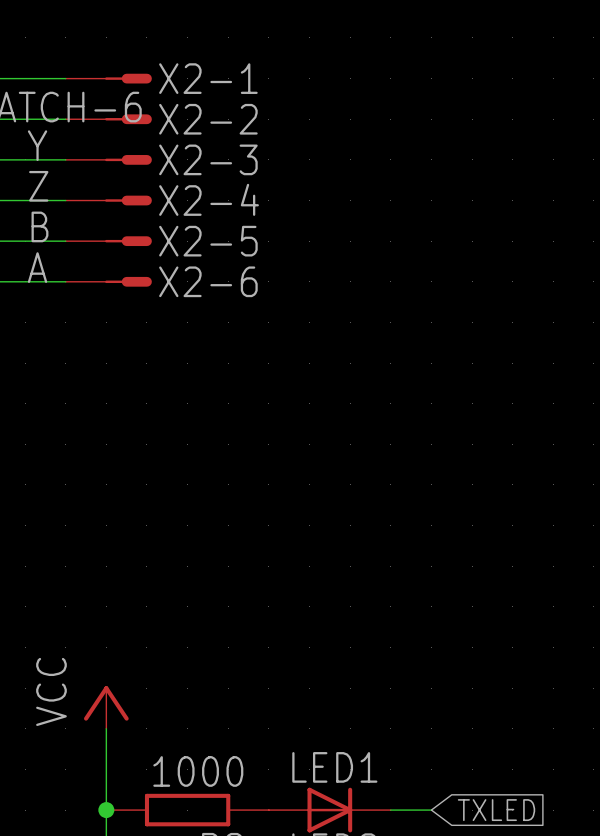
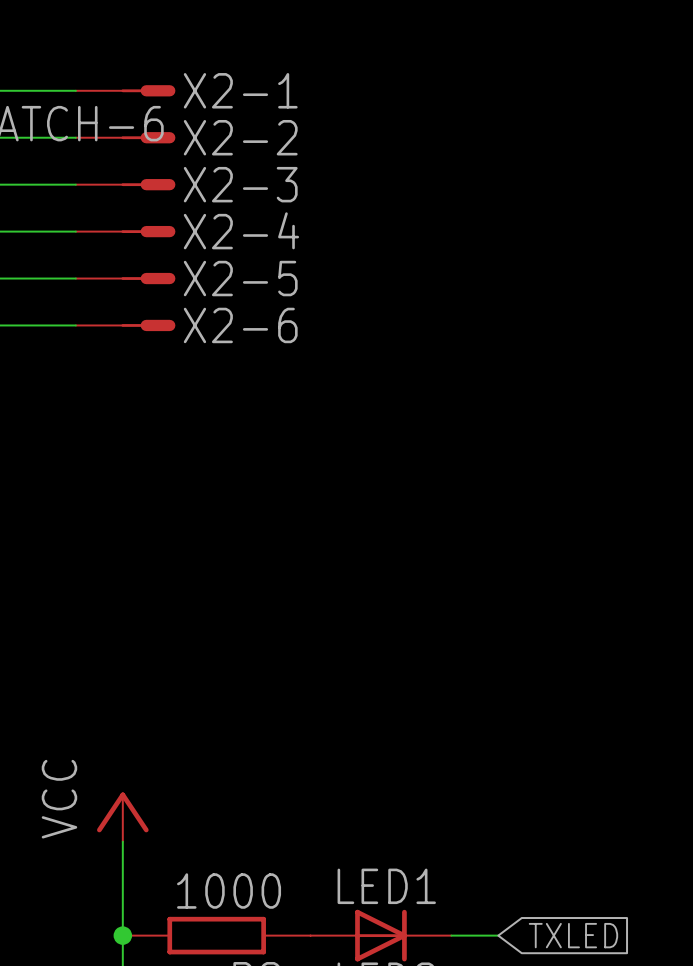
label: Y (37, 145) -> none
label: Z (38, 186) -> none
label: B (39, 226) -> none
label: A (37, 267) -> none

